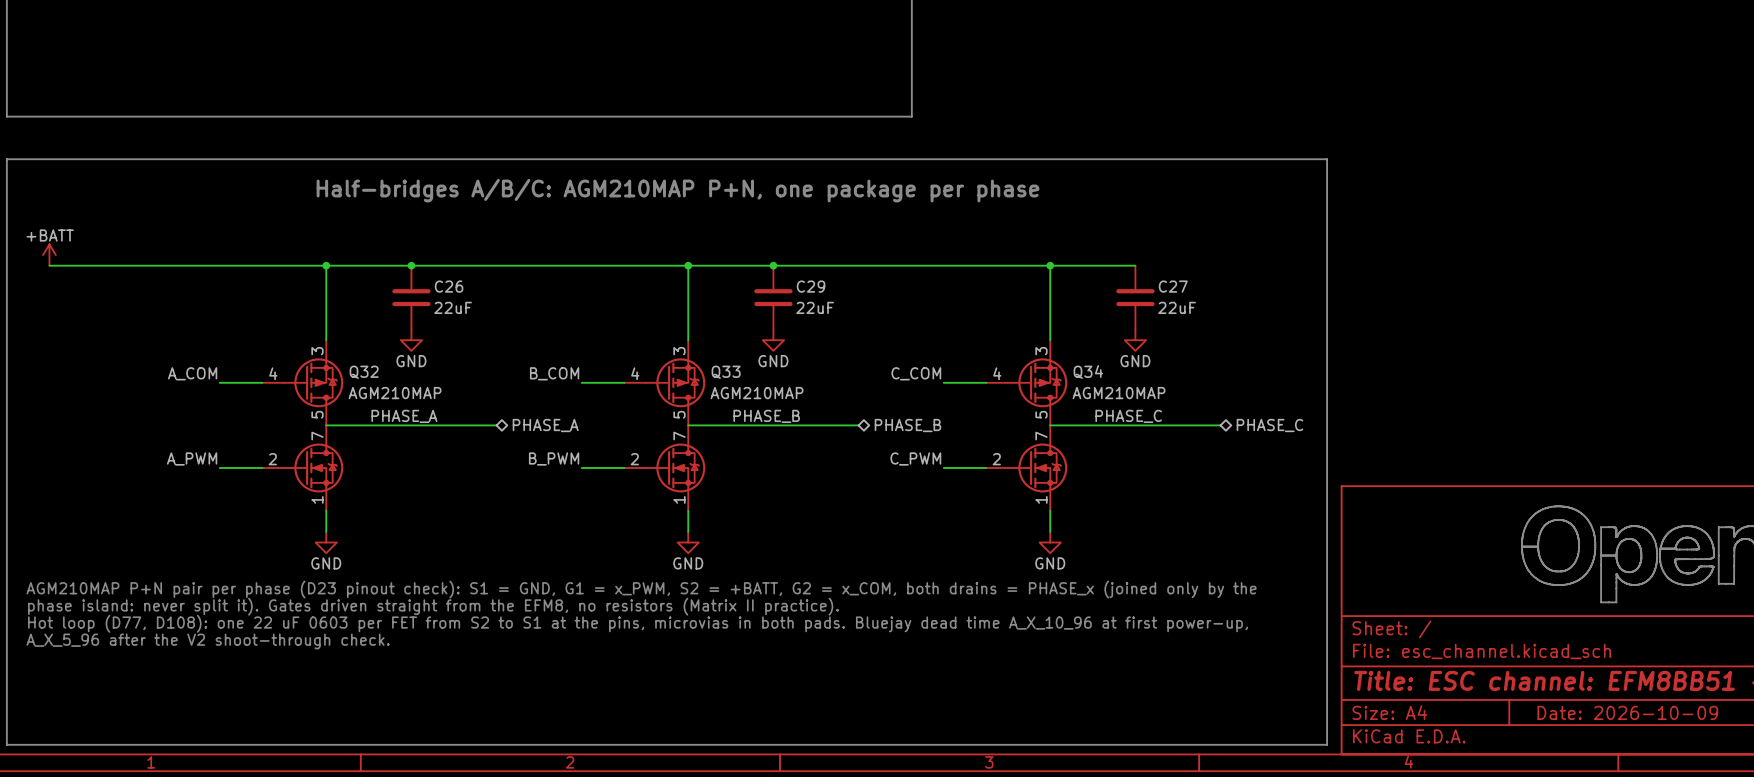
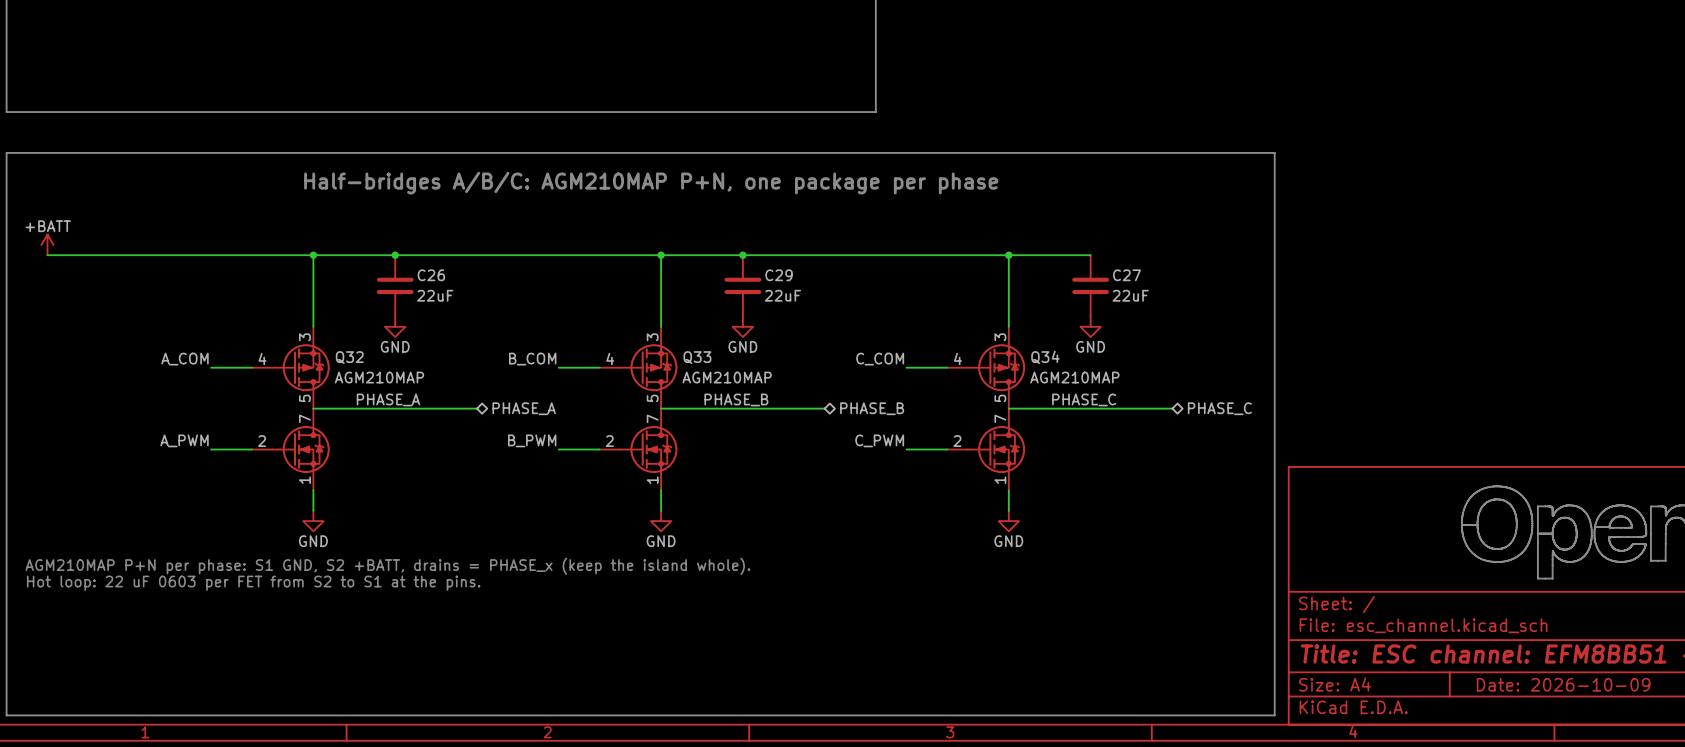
text: AGM210MAP P+N pair per phase (D23 pinout check): S1 = GND, G1 = x_PWM, S2 = +BATT, G2 = x_COM, both drains = PHASE_x (joined only by the (641, 589) -> AGM210MAP P+N per phase: S1 GND, S2 +BATT, drains = PHASE_x (keep the island whole). (387, 566)
text: phase island: never split it). Gates driven straight from the EFM8, no resistors (Matrix II practice). (433, 606) -> Hot loop: 22 uF 0603 per FET from S2 to S1 at the pins. (253, 583)
text: Hot loop (D77, D108): one 22 uF 0603 per FET from S2 to S1 at the pins, microvias in both pads. Bluejay dead time A_X_10_96 at first power-up, (638, 623) -> none
text: A_X_5_96 after the V2 shoot-through check. (208, 641) -> none

